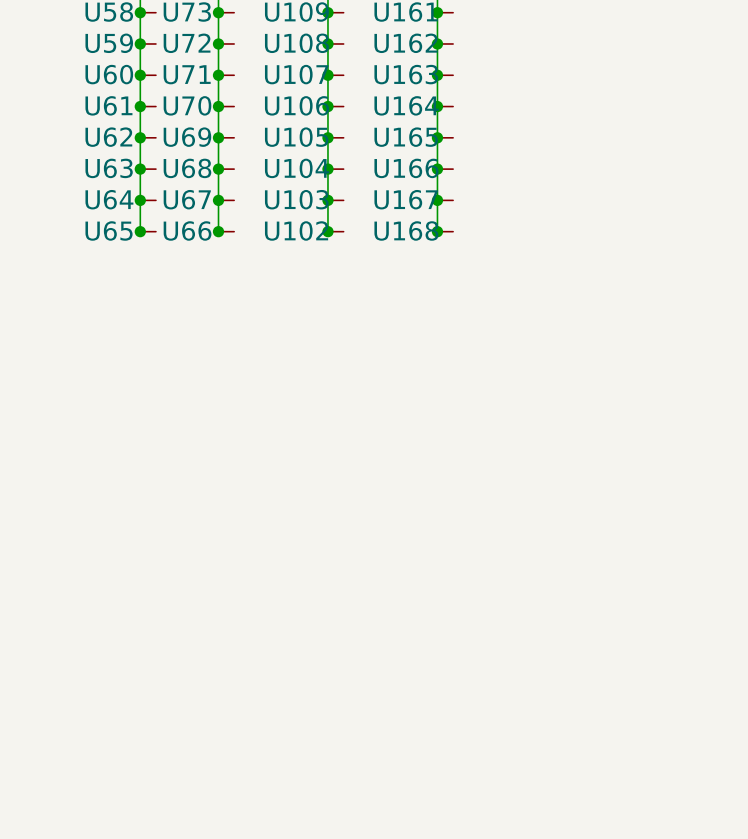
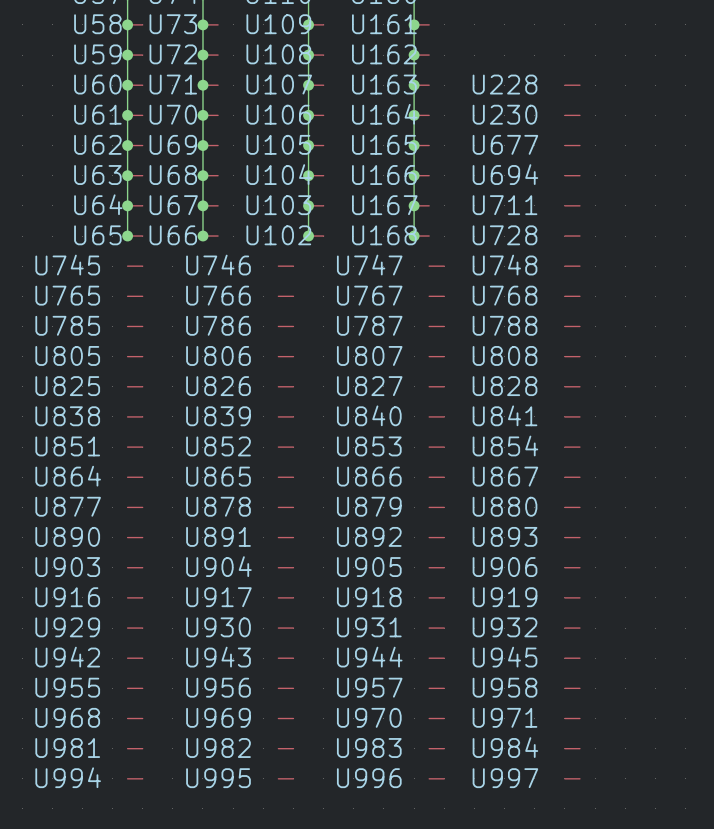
U228: none -> (572, 85)
U230: none -> (572, 115)
U677: none -> (572, 145)
U694: none -> (572, 175)
U711: none -> (572, 205)
U728: none -> (572, 236)
U745: none -> (135, 266)
U746: none -> (285, 266)
U747: none -> (436, 266)
U748: none -> (572, 266)
U765: none -> (135, 296)
U766: none -> (285, 296)
U767: none -> (436, 296)
U768: none -> (572, 296)
U785: none -> (135, 326)
U786: none -> (285, 326)
U787: none -> (436, 326)
U788: none -> (572, 326)
U805: none -> (135, 356)
U806: none -> (285, 356)
U807: none -> (436, 356)
U808: none -> (572, 356)
U825: none -> (135, 386)
U826: none -> (285, 386)
U827: none -> (436, 386)
U828: none -> (572, 386)
U838: none -> (135, 416)
U839: none -> (285, 416)
U840: none -> (436, 416)
U841: none -> (572, 416)
U851: none -> (135, 447)
U852: none -> (285, 447)
U853: none -> (436, 447)
U854: none -> (572, 447)
U864: none -> (135, 477)
U865: none -> (285, 477)
U866: none -> (436, 477)
U867: none -> (572, 477)
U877: none -> (135, 507)
U878: none -> (285, 507)
U879: none -> (436, 507)
U880: none -> (572, 507)
U890: none -> (135, 537)
U891: none -> (285, 537)
U892: none -> (436, 537)
U893: none -> (572, 537)
U903: none -> (135, 567)
U904: none -> (285, 567)
U905: none -> (436, 567)
U906: none -> (572, 567)
U916: none -> (135, 597)
U917: none -> (285, 597)
U918: none -> (436, 597)
U919: none -> (572, 597)
U929: none -> (135, 628)
U930: none -> (285, 628)
U931: none -> (436, 628)
U932: none -> (572, 628)
U942: none -> (135, 658)
U943: none -> (285, 658)
U944: none -> (436, 658)
U945: none -> (572, 658)
U955: none -> (135, 688)
U956: none -> (285, 688)
U957: none -> (436, 688)
U958: none -> (572, 688)
U968: none -> (135, 718)
U969: none -> (285, 718)
U970: none -> (436, 718)
U971: none -> (572, 718)
U981: none -> (135, 748)
U982: none -> (285, 748)
U983: none -> (436, 748)
U984: none -> (572, 748)
U994: none -> (135, 778)
U995: none -> (285, 778)
U996: none -> (436, 778)
U997: none -> (572, 778)

